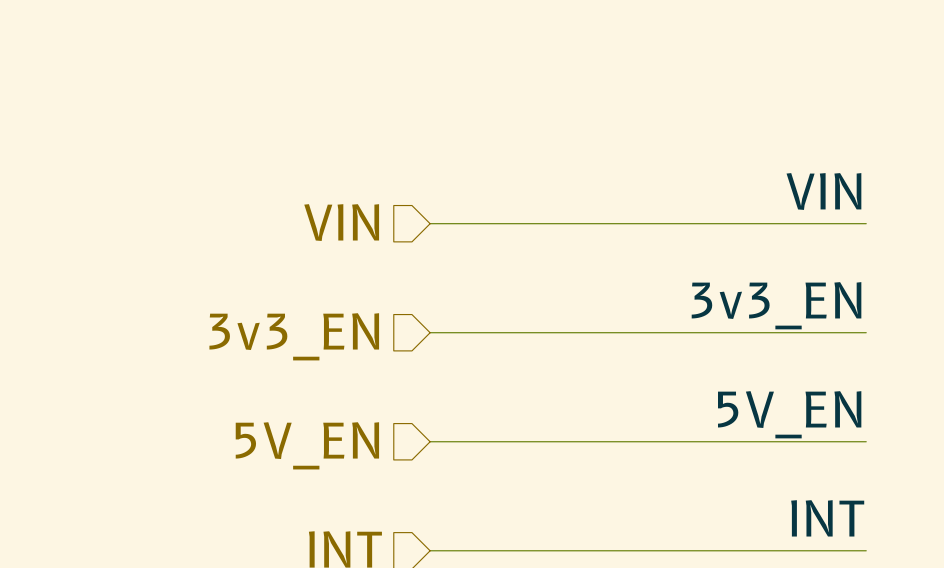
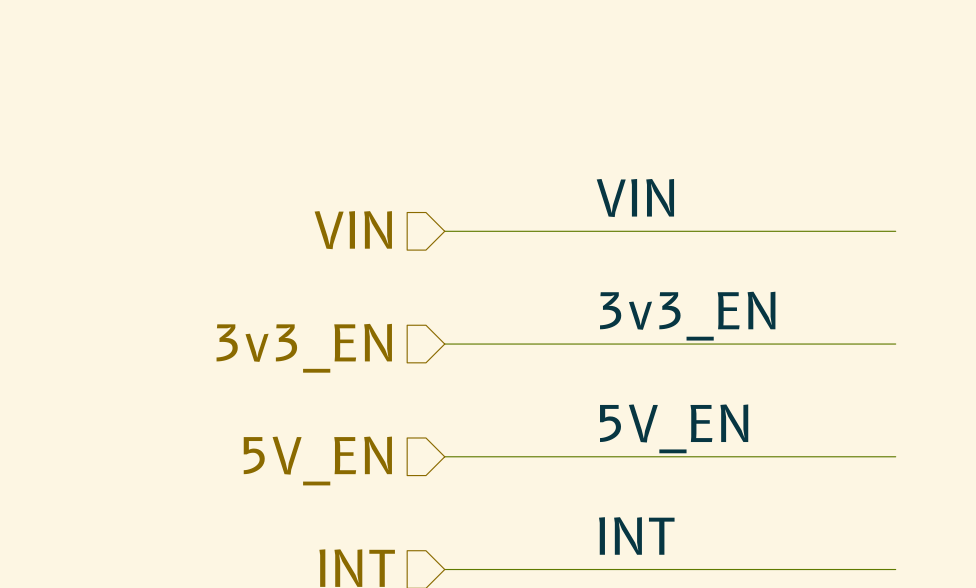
label position: VIN (823, 191) -> VIN (635, 198)
label position: 3v3_EN (776, 305) -> 3v3_EN (687, 316)
label position: 5V_EN (789, 414) -> 5V_EN (674, 428)
label position: INT (827, 518) -> INT (636, 535)

